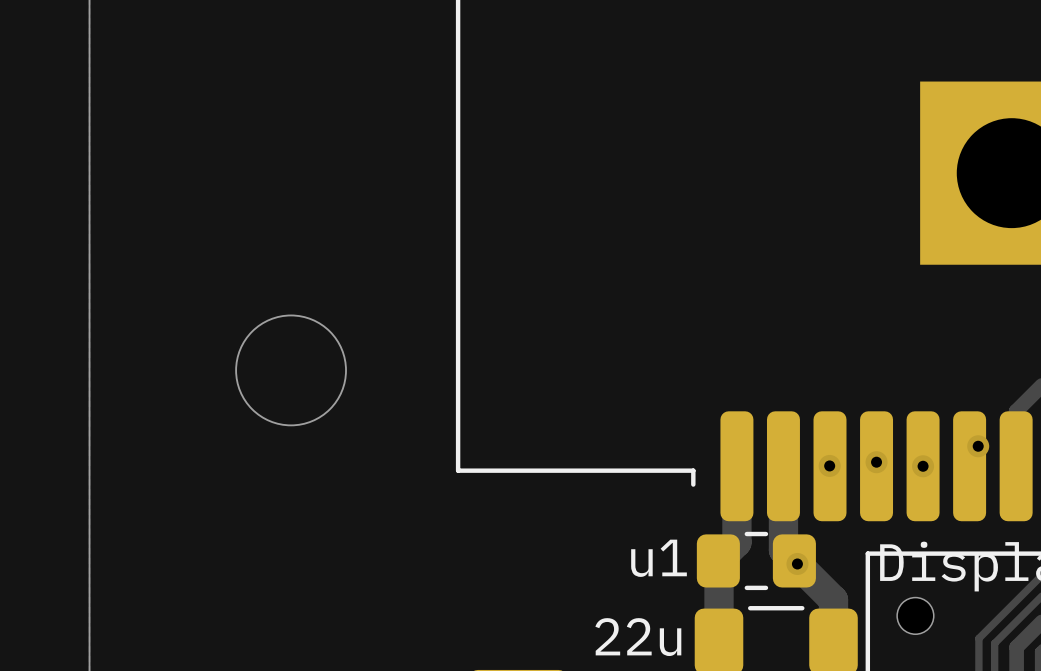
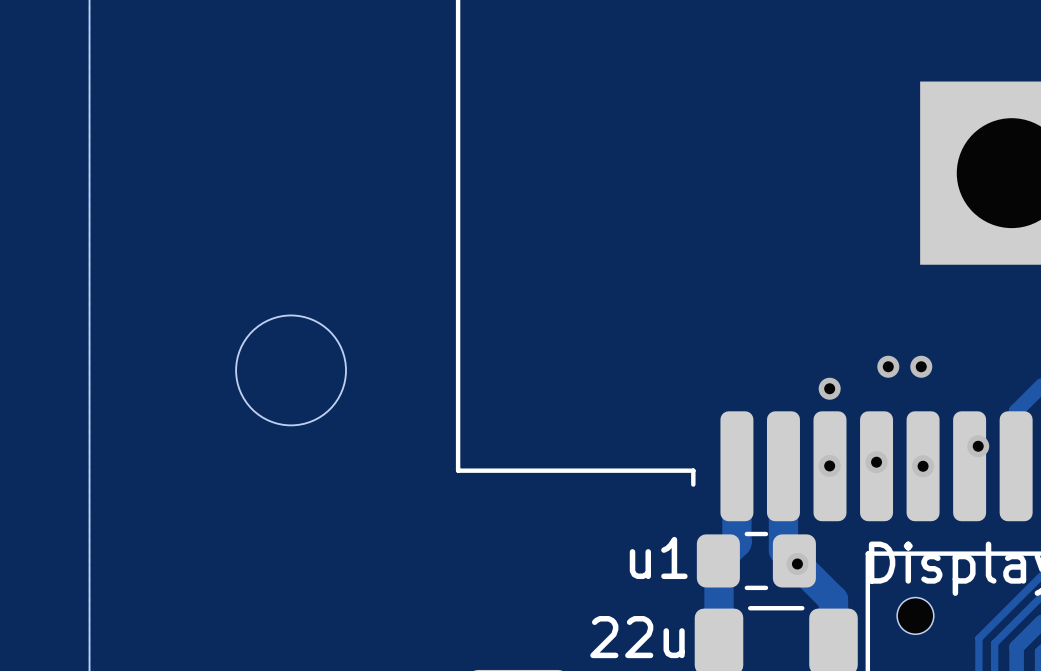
via: none -> (888, 366)
via: none -> (921, 366)
via: none -> (829, 388)

